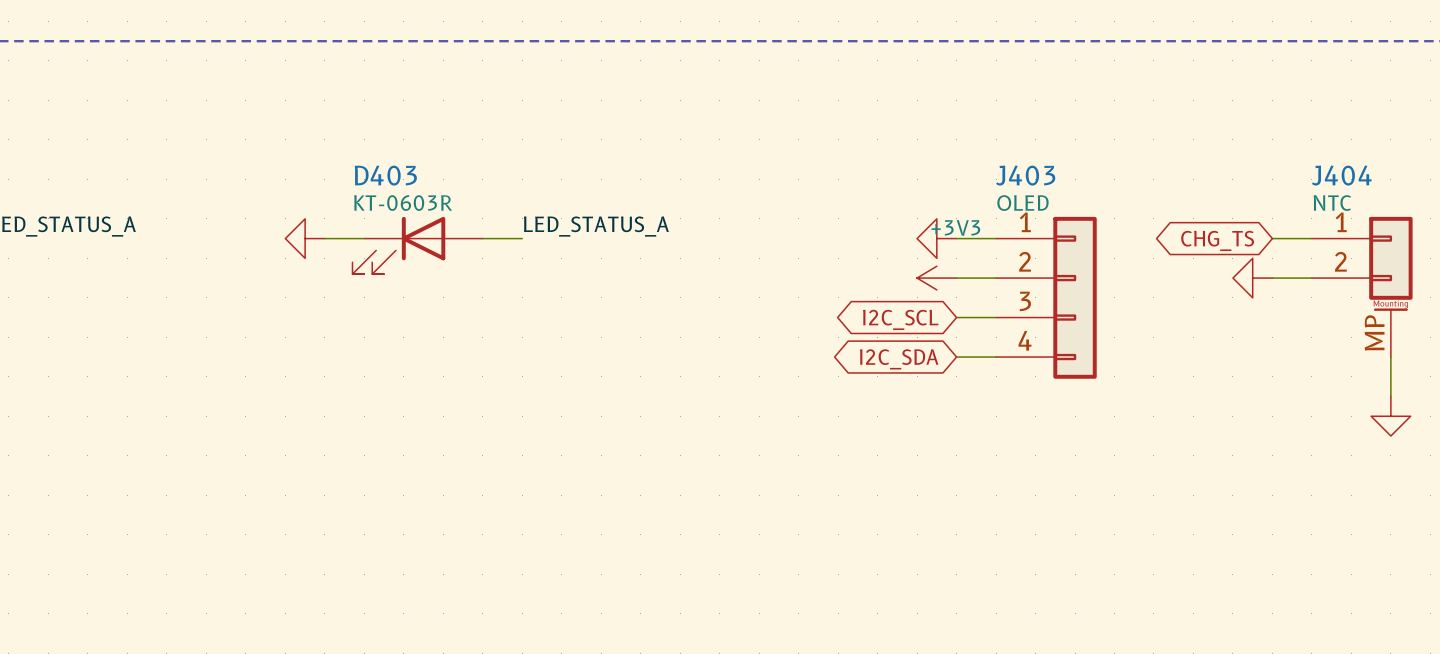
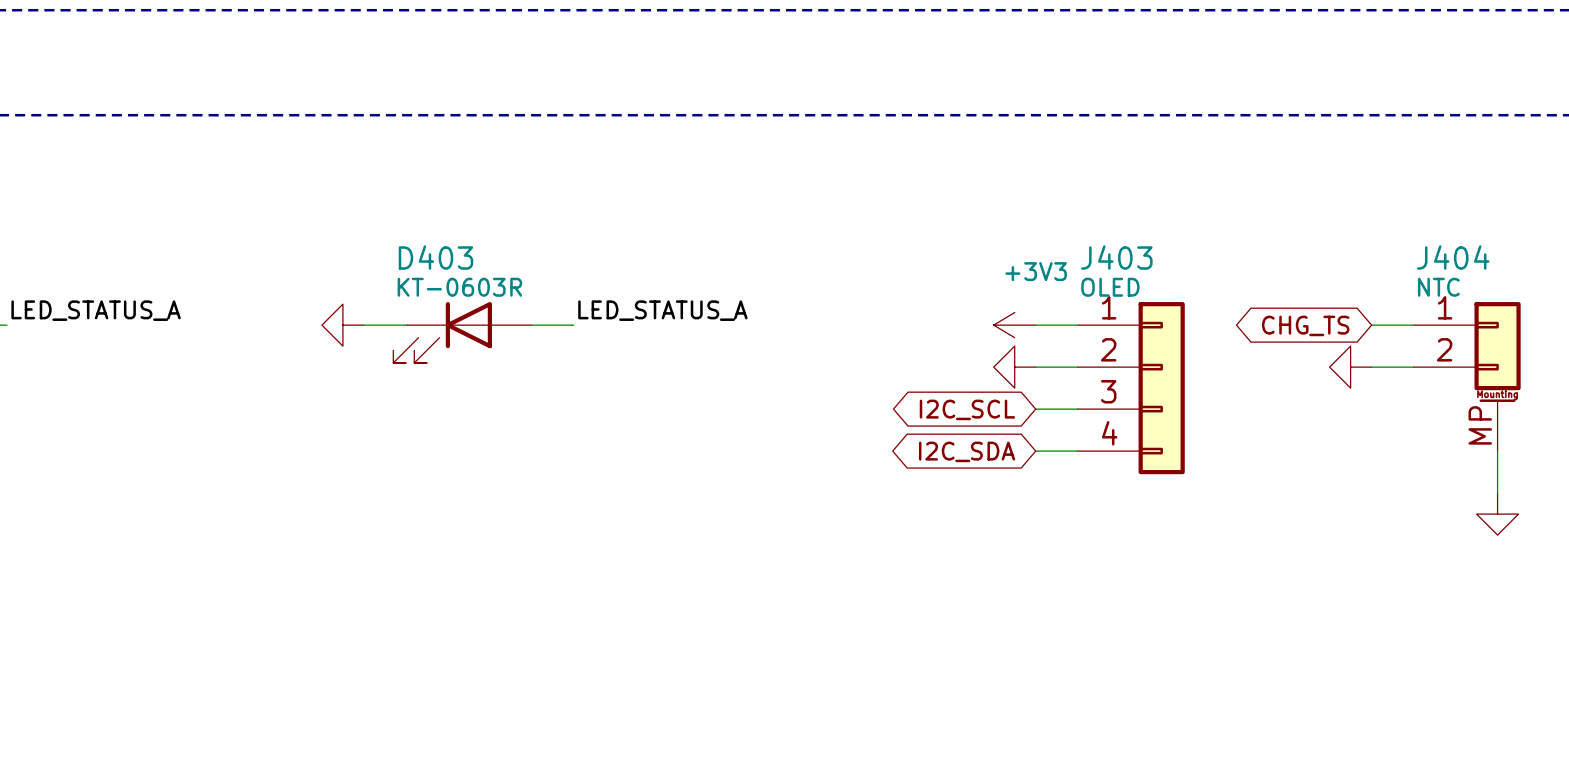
power symbol text: none -> +3V3 (1036, 271)
power symbol shape: [917, 218, 957, 259] -> [993, 312, 1036, 338]
power symbol text: +3V3 (955, 227) -> none
power symbol shape: [917, 266, 957, 290] -> [993, 346, 1036, 389]

